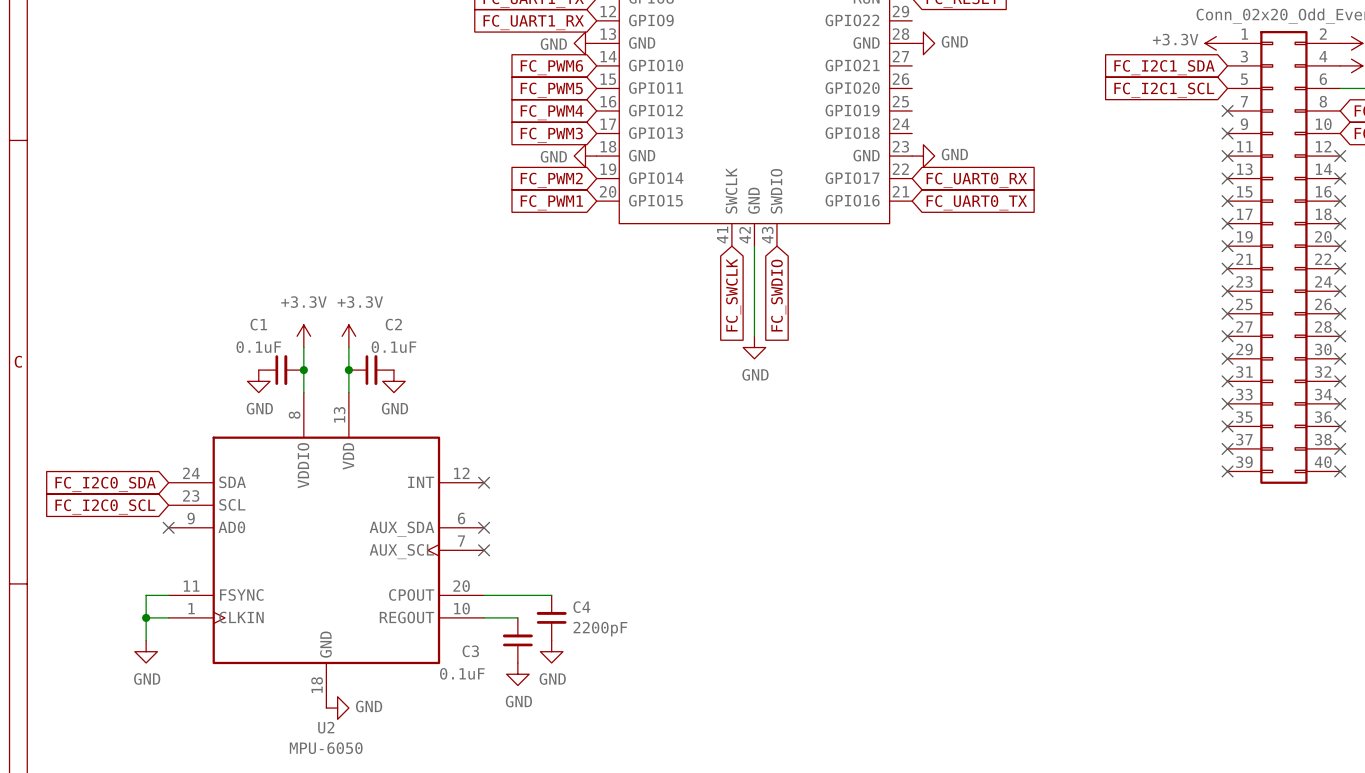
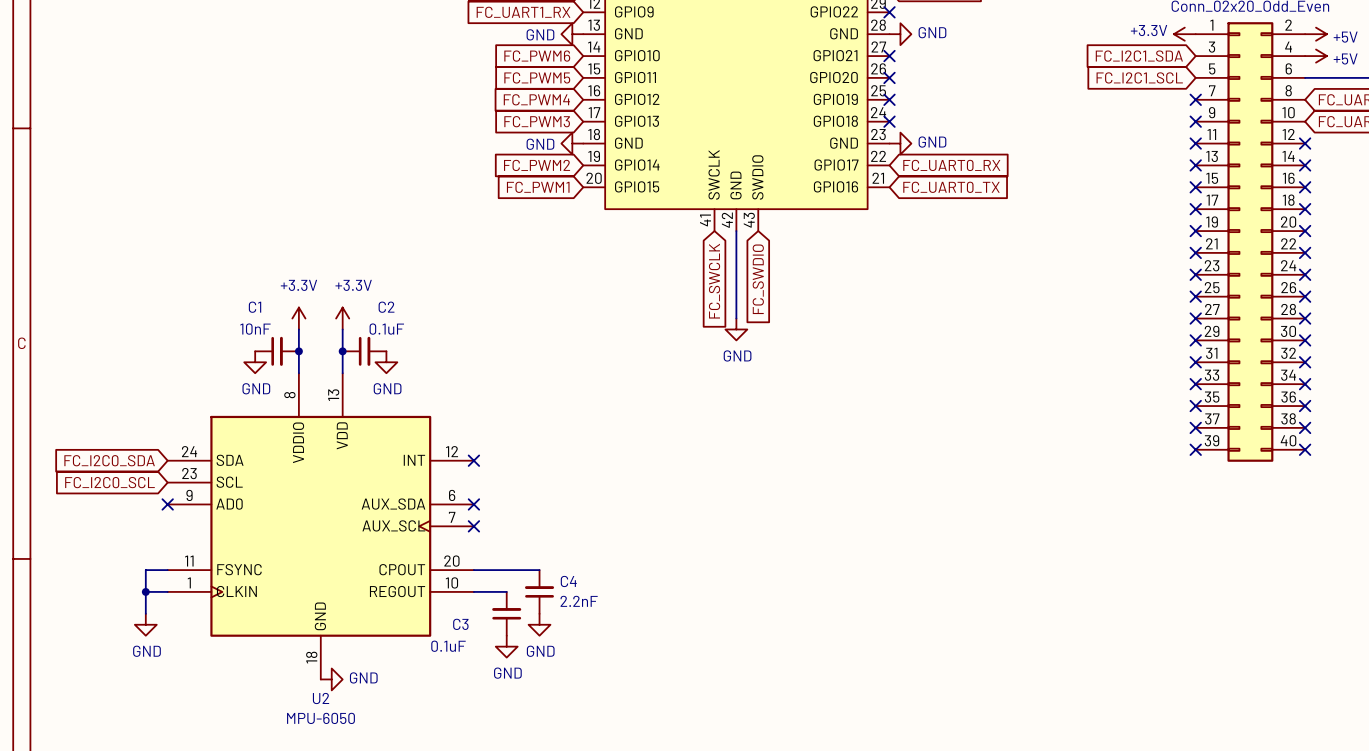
no-connect mark: none -> (889, 12)
no-connect mark: none -> (889, 56)
no-connect mark: none -> (889, 77)
no-connect mark: none -> (889, 99)
no-connect mark: none -> (889, 121)
C1 value: 0.1uF (258, 347) -> 10nF (255, 329)
C4 value: 2200pF (600, 629) -> 2.2nF (579, 601)

